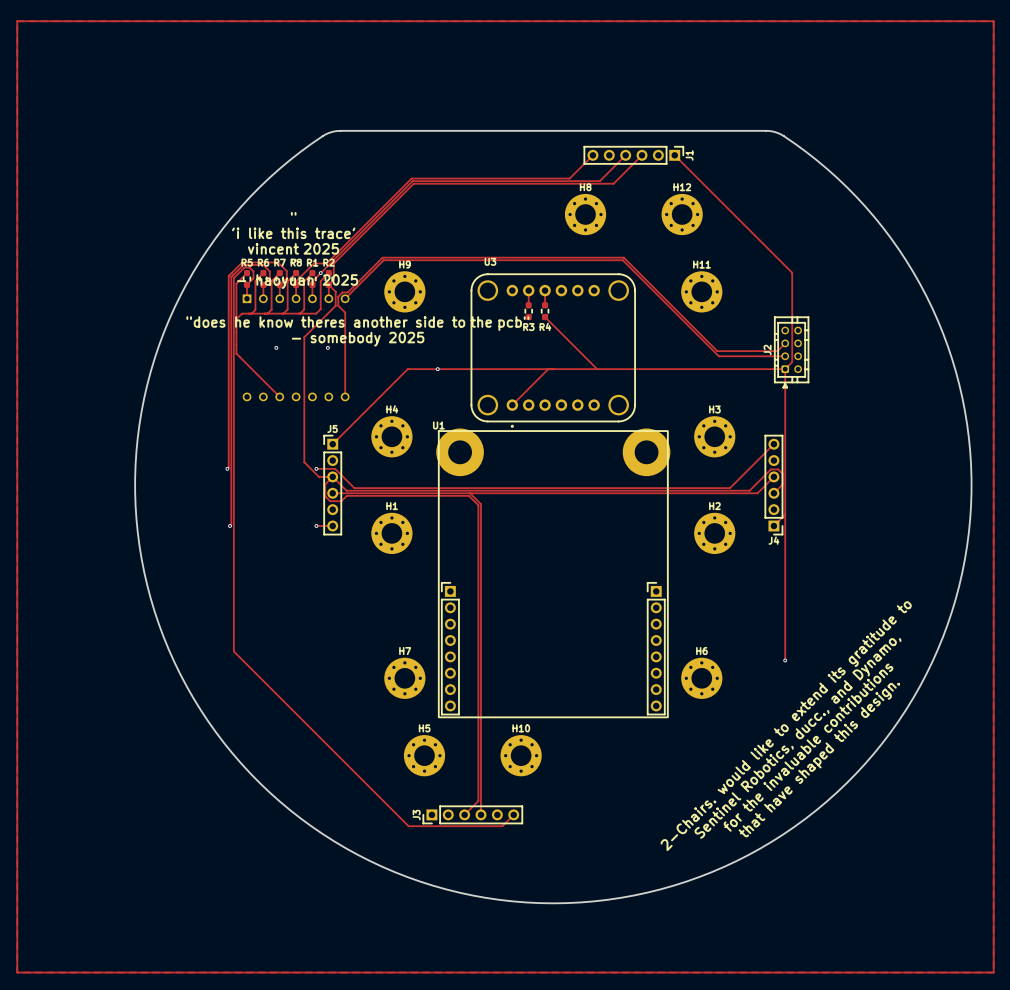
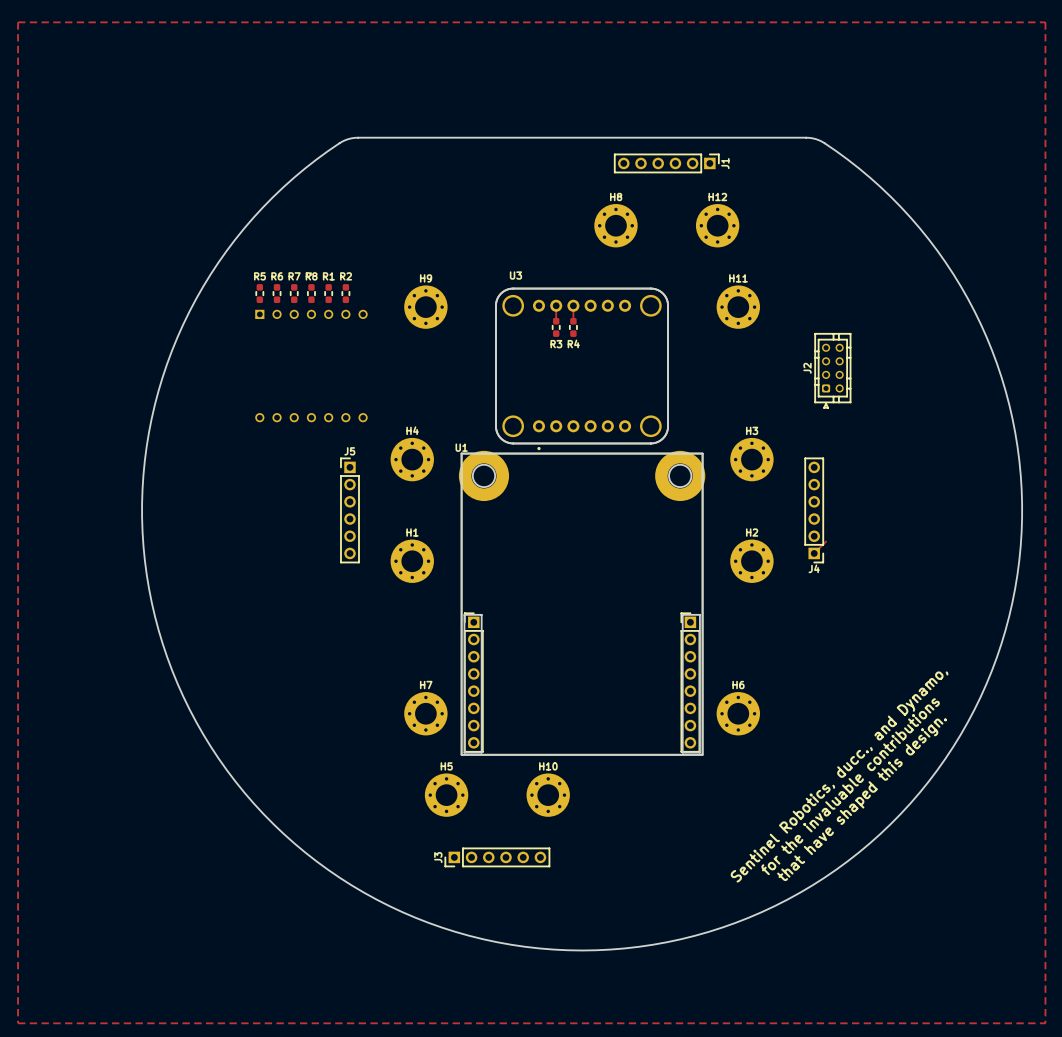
track: (17, 21) (993, 21) (993, 972) (17, 972) (17, 21) -> none
track: (592, 155) (569, 178) (411, 178) (326, 263) (313, 263) (296, 281) (296, 298) -> none
track: (625, 155) (599, 181) (412, 181) (318, 275) -> none
track: (642, 155) (613, 183) (413, 183) (333, 263) (333, 279) (328, 284) -> none
track: (674, 155) (792, 272) (792, 362) (785, 369) -> none
text: " (293, 213) -> none
text: 'i like this trace' (293, 233) -> none
text: vincent 2025 (293, 248) -> none
track: (247, 273) (236, 283) (236, 353) (279, 396) -> none
track: (263, 273) (255, 281) (255, 309) (251, 313) -> none
track: (279, 273) (271, 281) (271, 309) (267, 313) -> none
track: (296, 273) (287, 281) (287, 309) (283, 313) -> none
track: (312, 273) (304, 281) (304, 309) (300, 313) -> none
via: (320, 273) -> none
track: (328, 273) (320, 281) (320, 309) (316, 313) (241, 313) (236, 319) -> none
board edge: none -> (513, 288) (650, 288) (663, 293) (668, 305) (668, 426) (663, 438) (650, 443) (513, 443) (500, 438) (495, 426) (496, 303) (502, 292) (513, 288)
track: (318, 275) (312, 281) (312, 298) -> none
text: - haoyuan 2025 (297, 281) -> none
track: (328, 284) (335, 291) (335, 305) (304, 337) (304, 462) (319, 476) (332, 476) -> none
track: (328, 284) (328, 298) -> none
track: (247, 298) (247, 284) (253, 278) (253, 271) (249, 267) (244, 267) (233, 278) (233, 651) (408, 826) (502, 826) (513, 814) -> none
track: (263, 298) (263, 284) (269, 278) (269, 271) (263, 265) (243, 265) (231, 277) (229, 525) -> none
track: (279, 298) (279, 284) (286, 277) (286, 271) (278, 262) (242, 262) (228, 276) (227, 468) -> none
track: (345, 298) (383, 260) (622, 260) (718, 356) (785, 356) -> none
track: (545, 317) (597, 369) -> none
text: "does he know theres another side to the pcb" (357, 323) -> none
text: - somebody 2025 (358, 339) -> none
track: (785, 343) (777, 351) (717, 351) (623, 257) (382, 257) (347, 292) (342, 292) (338, 296) (338, 305) (345, 312) (345, 396) -> none
via: (276, 347) -> none
via: (327, 347) -> none
via: (437, 369) -> none
track: (548, 369) (512, 405) -> none
track: (785, 369) (407, 369) (332, 444) -> none
track: (785, 369) (785, 660) -> none
board edge: none -> (461, 453) (461, 754) (702, 754) (702, 453) (461, 453)
round board edge: none -> [472, 464, 496, 488]
round board edge: none -> [668, 464, 693, 488]
track: (773, 444) (730, 488) (354, 488) (335, 468) (316, 468) -> none
via: (227, 468) -> none
via: (316, 468) -> none
track: (332, 476) (346, 490) (749, 490) (770, 469) (778, 469) (782, 473) (782, 484) (773, 493) -> none
track: (332, 476) (325, 484) (325, 496) (330, 501) (341, 501) (346, 495) (468, 495) (478, 505) (478, 801) (464, 814) -> none
track: (773, 476) (757, 493) (332, 493) -> none
track: (470, 493) (481, 504) (481, 814) -> none
via: (229, 525) -> none
track: (316, 525) (332, 525) -> none
via: (316, 525) -> none
board edge: none -> (464, 614) (464, 752) (481, 752) (481, 614) (464, 614)
board edge: none -> (682, 614) (682, 752) (699, 752) (699, 614) (682, 614)
via: (785, 660) -> none
text: 2-Chairs. would like to extend its gratitude to (786, 726) -> none

